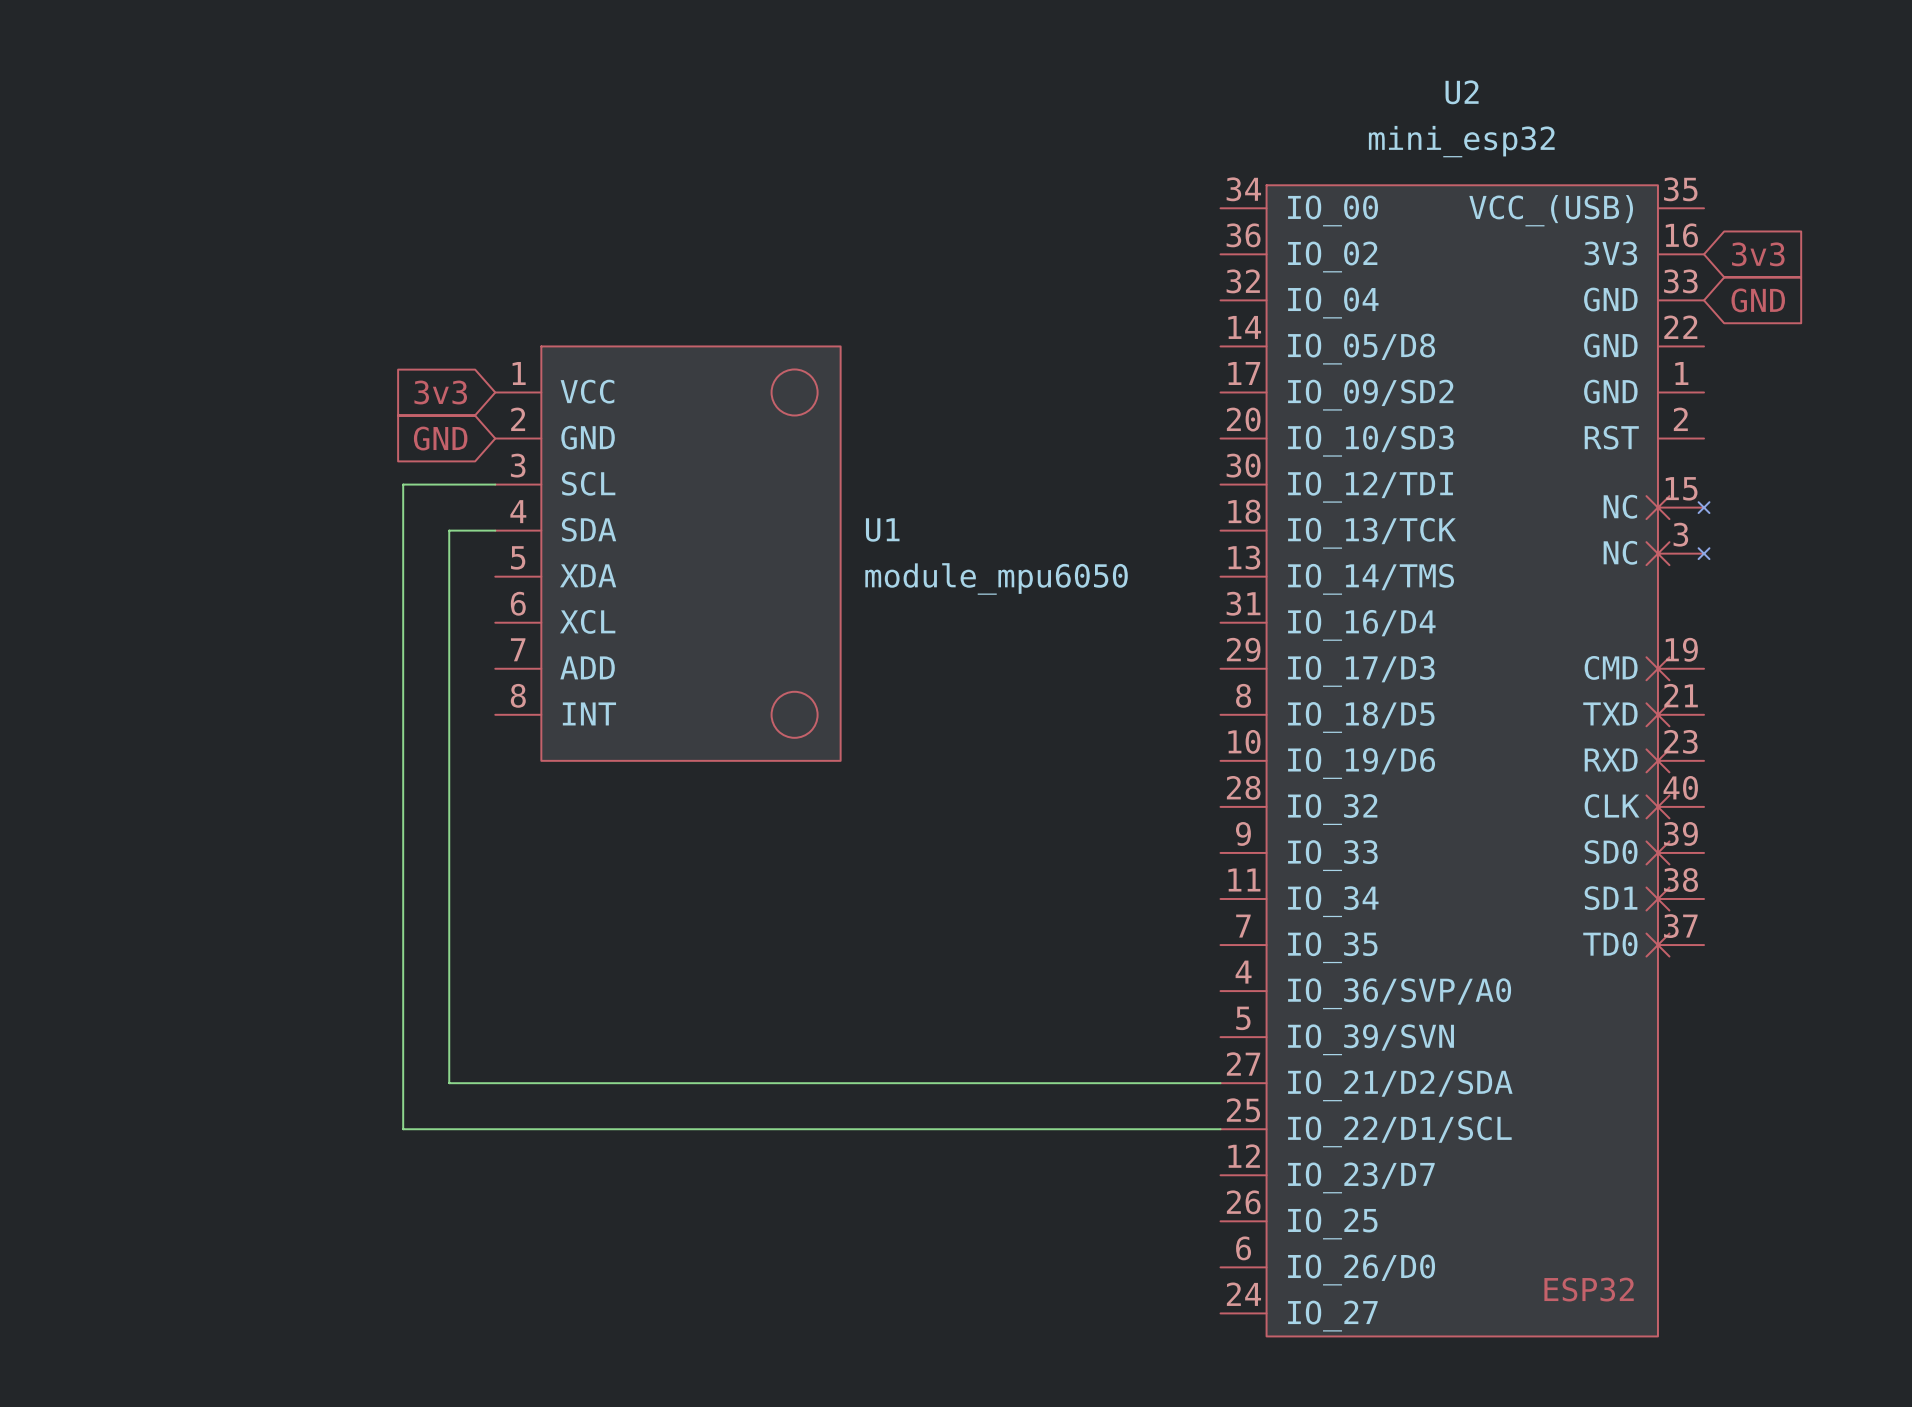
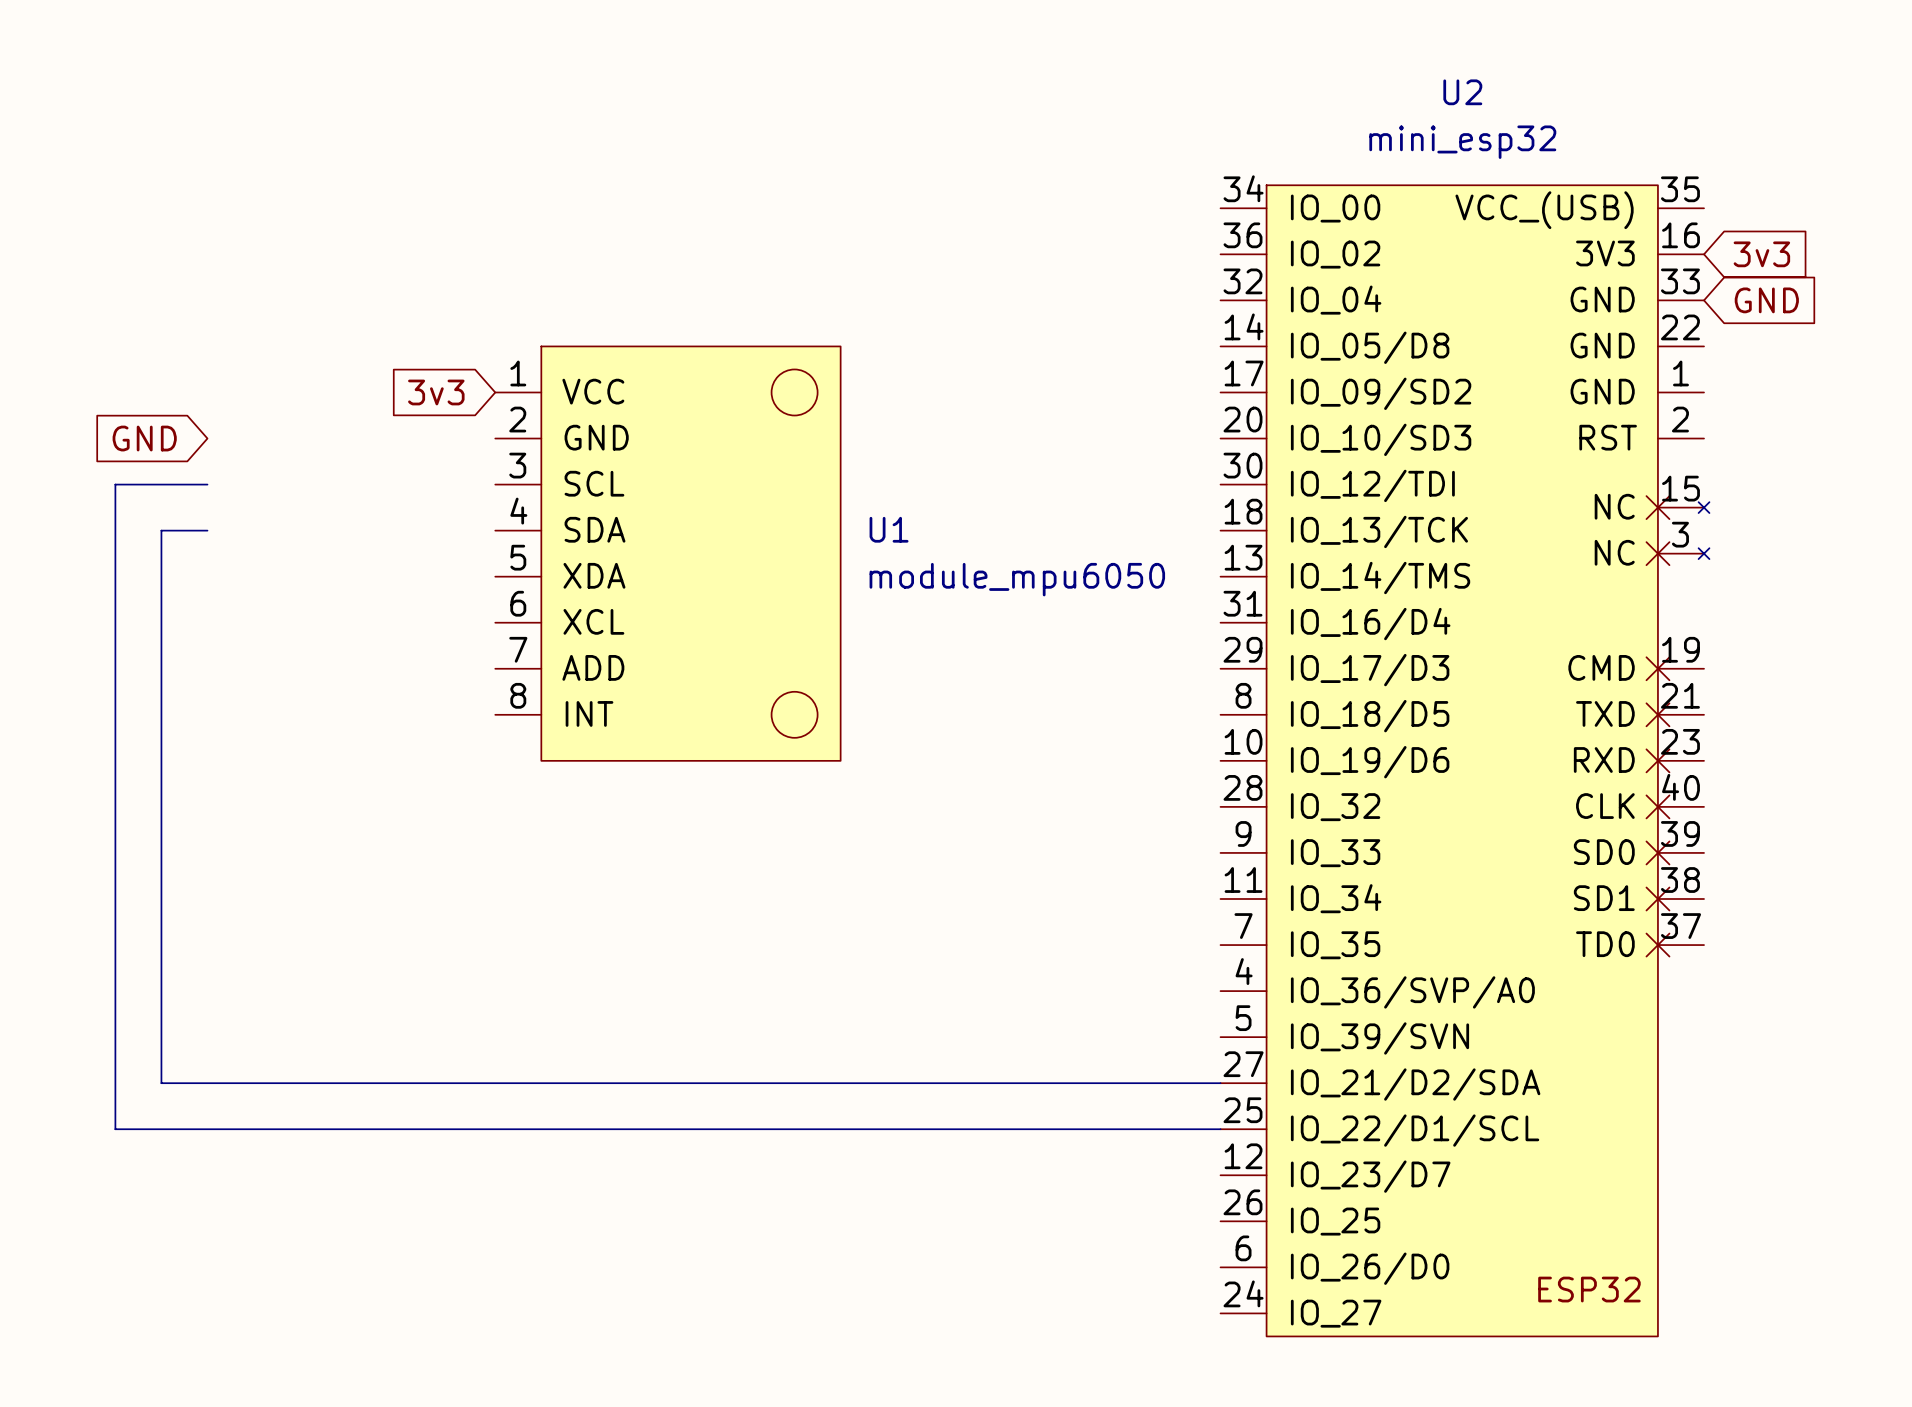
global label position: GND (440, 438) -> GND (144, 438)
wire: (495, 484) (403, 484) (403, 1129) -> (207, 484) (115, 484) (115, 1129) (403, 1129)
wire: (495, 530) (449, 530) (449, 1083) -> (207, 530) (161, 530) (161, 1083) (449, 1083)

